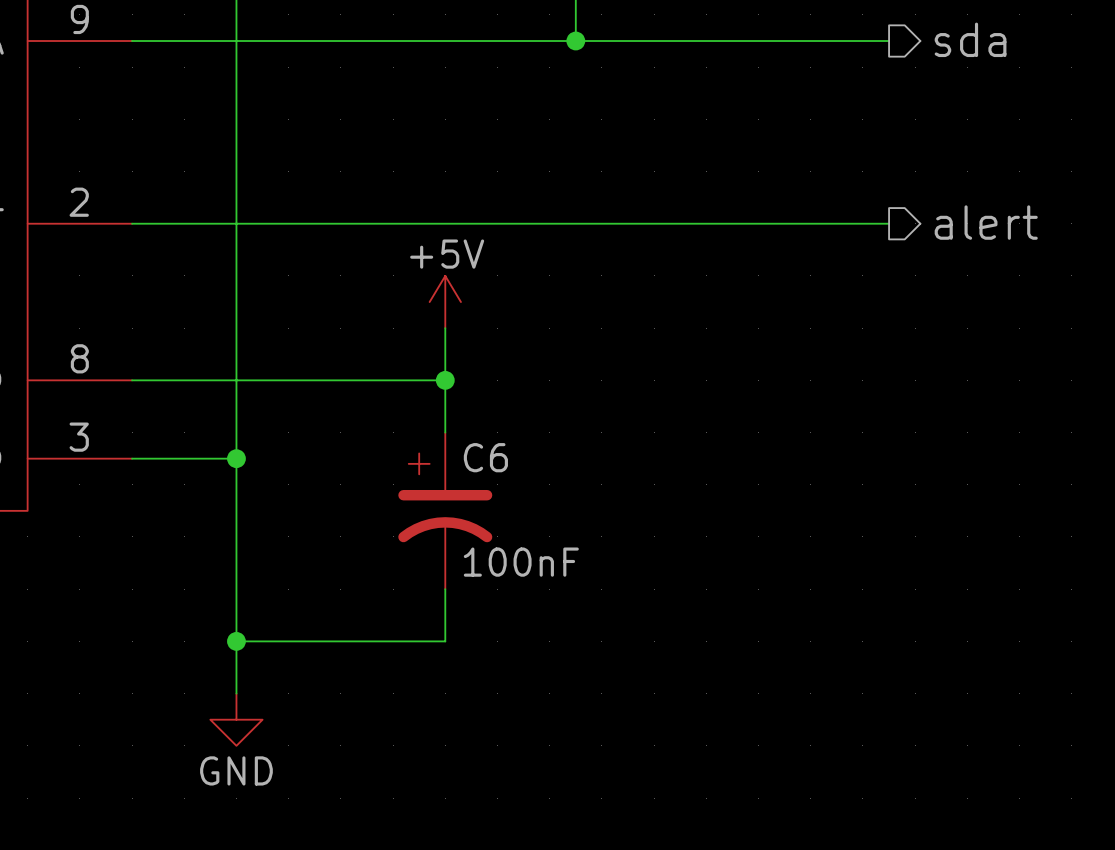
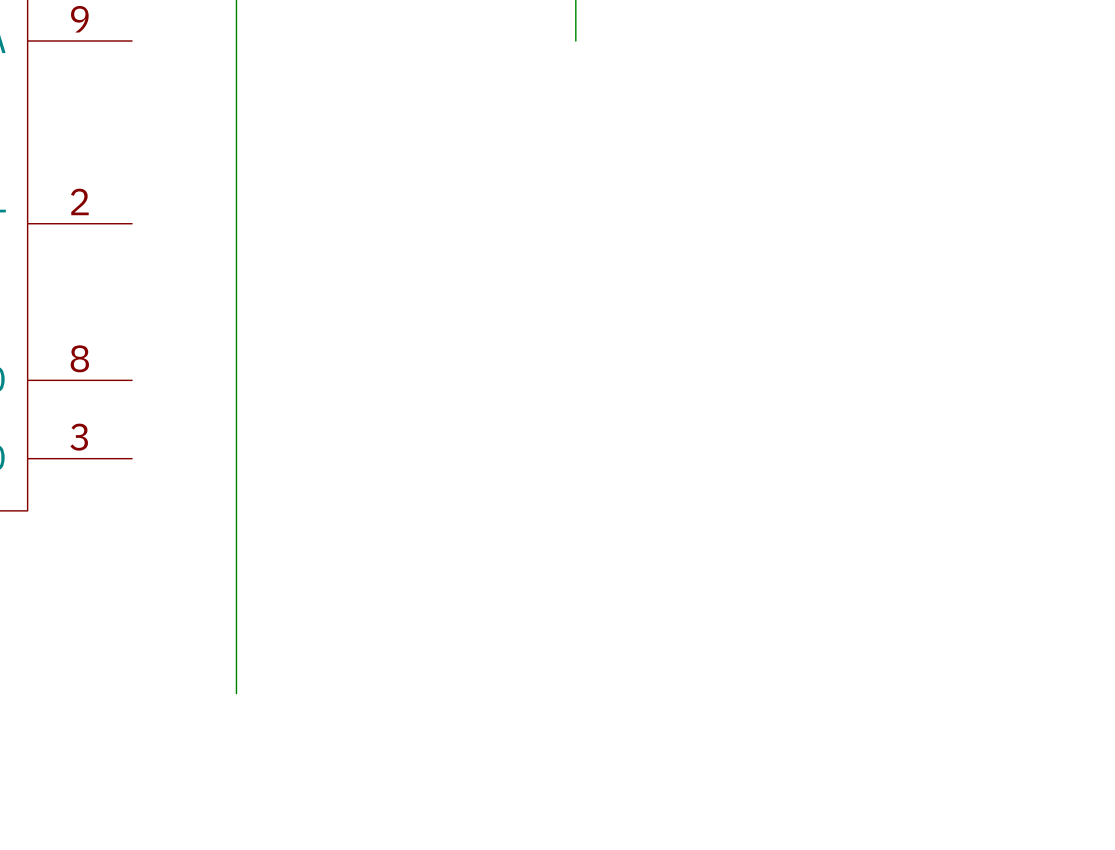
hierarchical label: sda (970, 39) -> none
wire: (132, 41) (889, 41) -> none
junction: (575, 41) -> none
hierarchical label: alert (986, 222) -> none
wire: (132, 223) (889, 223) -> none
power symbol: +5V (445, 302) -> none
wire: (445, 328) (445, 432) -> none
wire: (132, 380) (445, 380) -> none
junction: (445, 380) -> none
wire: (132, 458) (236, 458) -> none
junction: (236, 458) -> none
C6: 100nF (445, 510) -> none
wire: (445, 589) (445, 641) (236, 641) -> none
junction: (236, 641) -> none
power symbol: GND (236, 719) -> none

